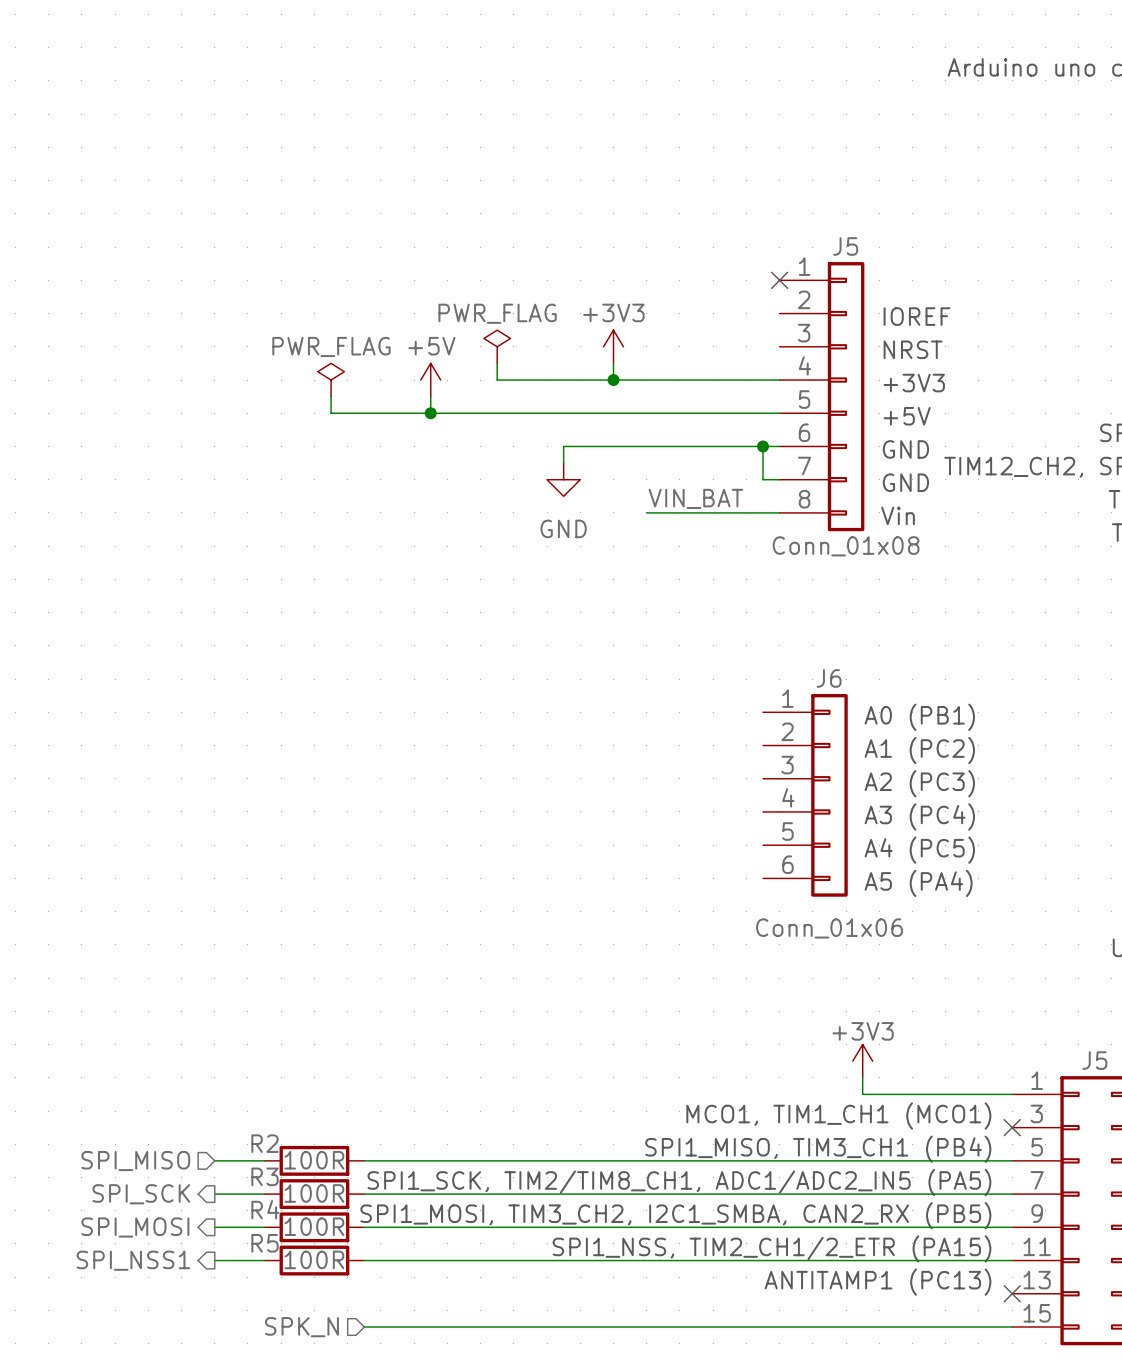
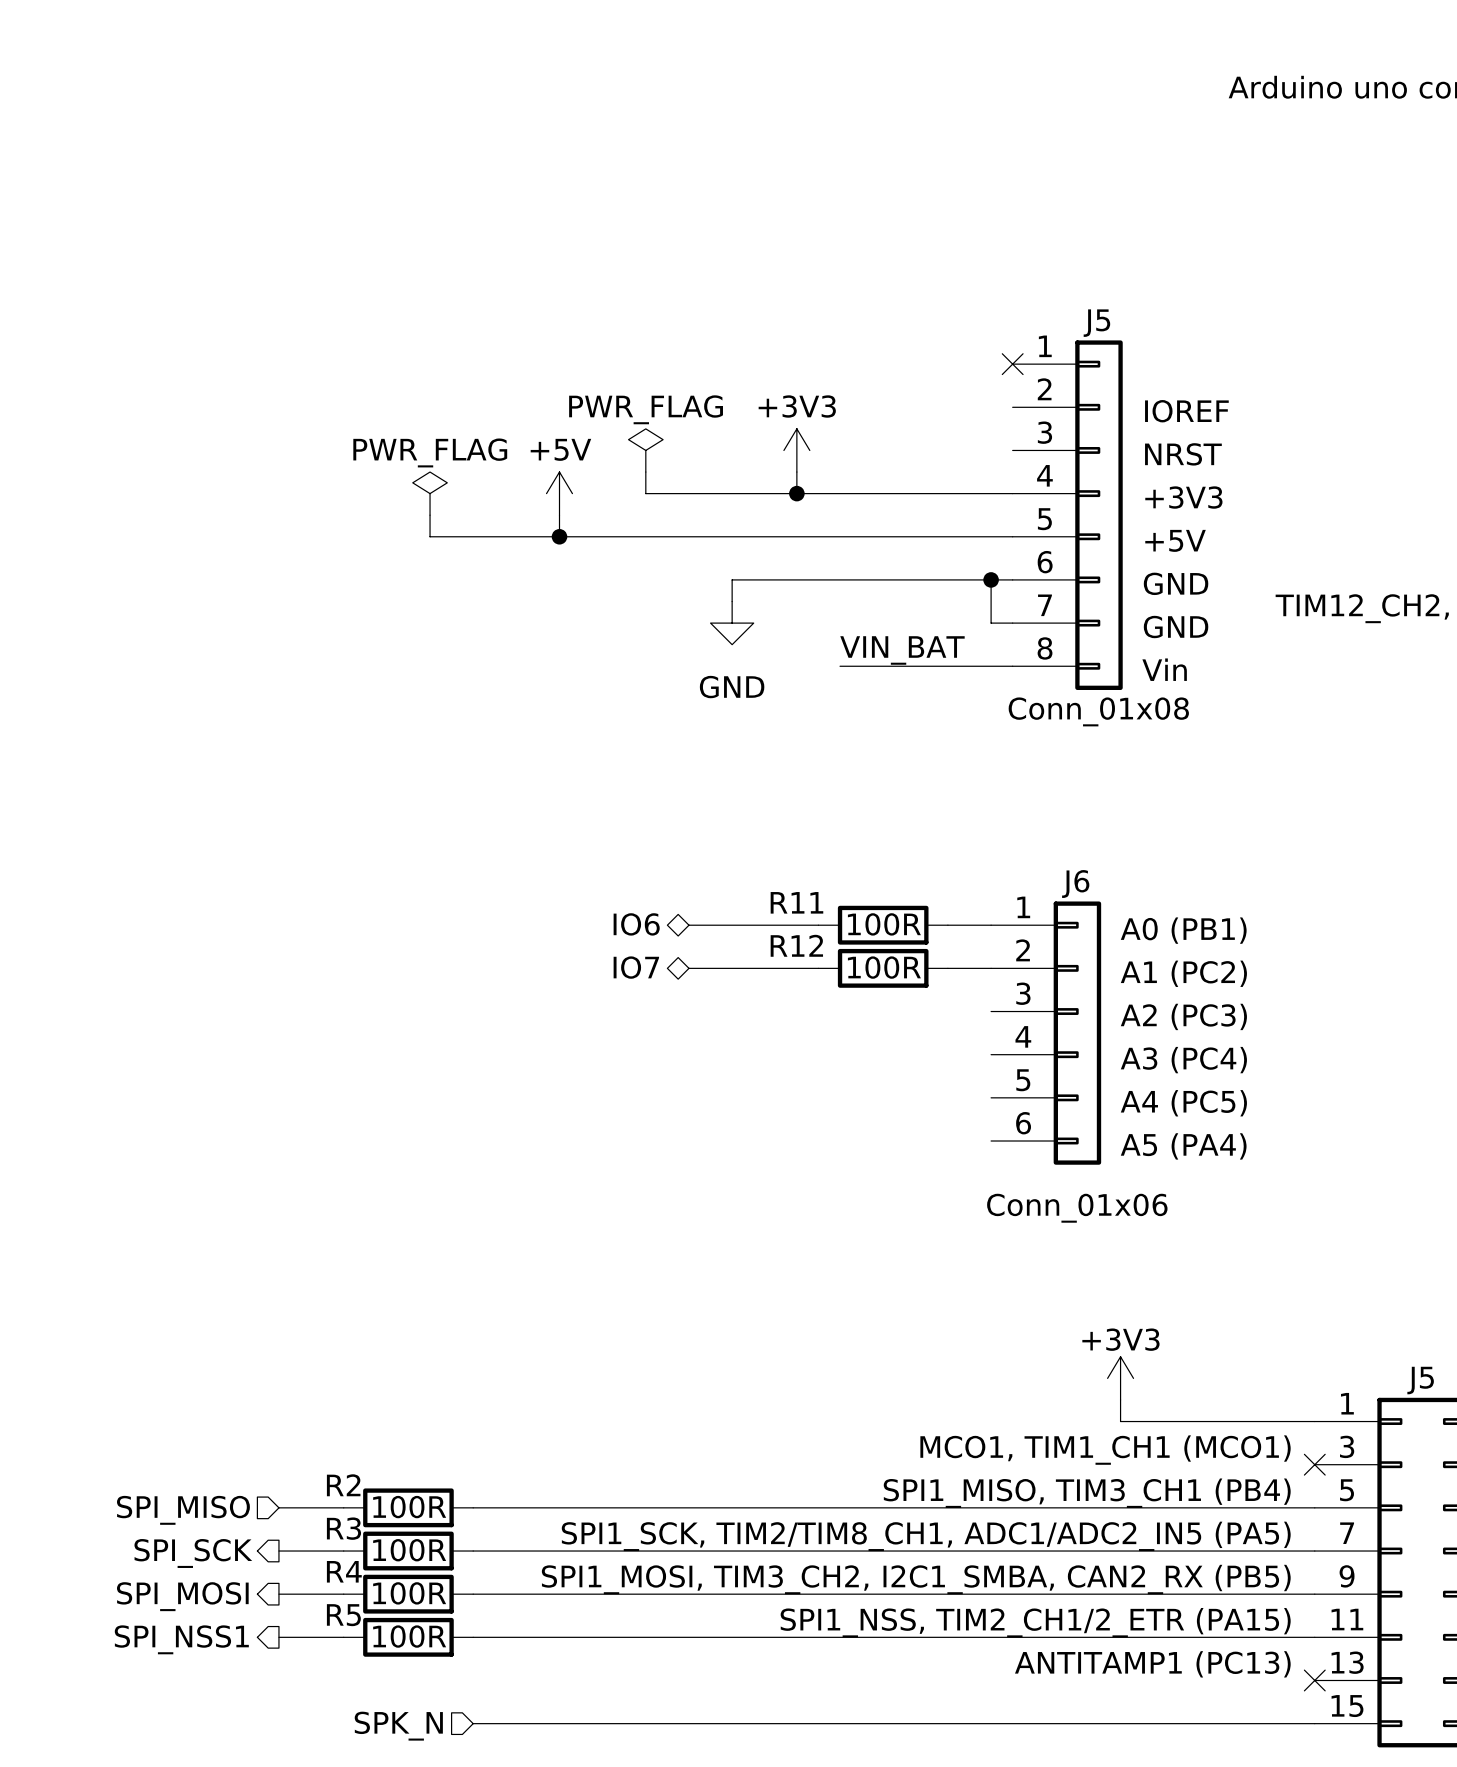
hierarchical label: none -> IO6 (636, 924)
wire: none -> (688, 925) (818, 925)
R11: none -> 100R (883, 925)
wire: none -> (947, 925) (991, 925)
hierarchical label: none -> IO7 (636, 967)
wire: none -> (688, 968) (818, 968)
R12: none -> 100R (883, 968)
wire: none -> (947, 968) (991, 968)

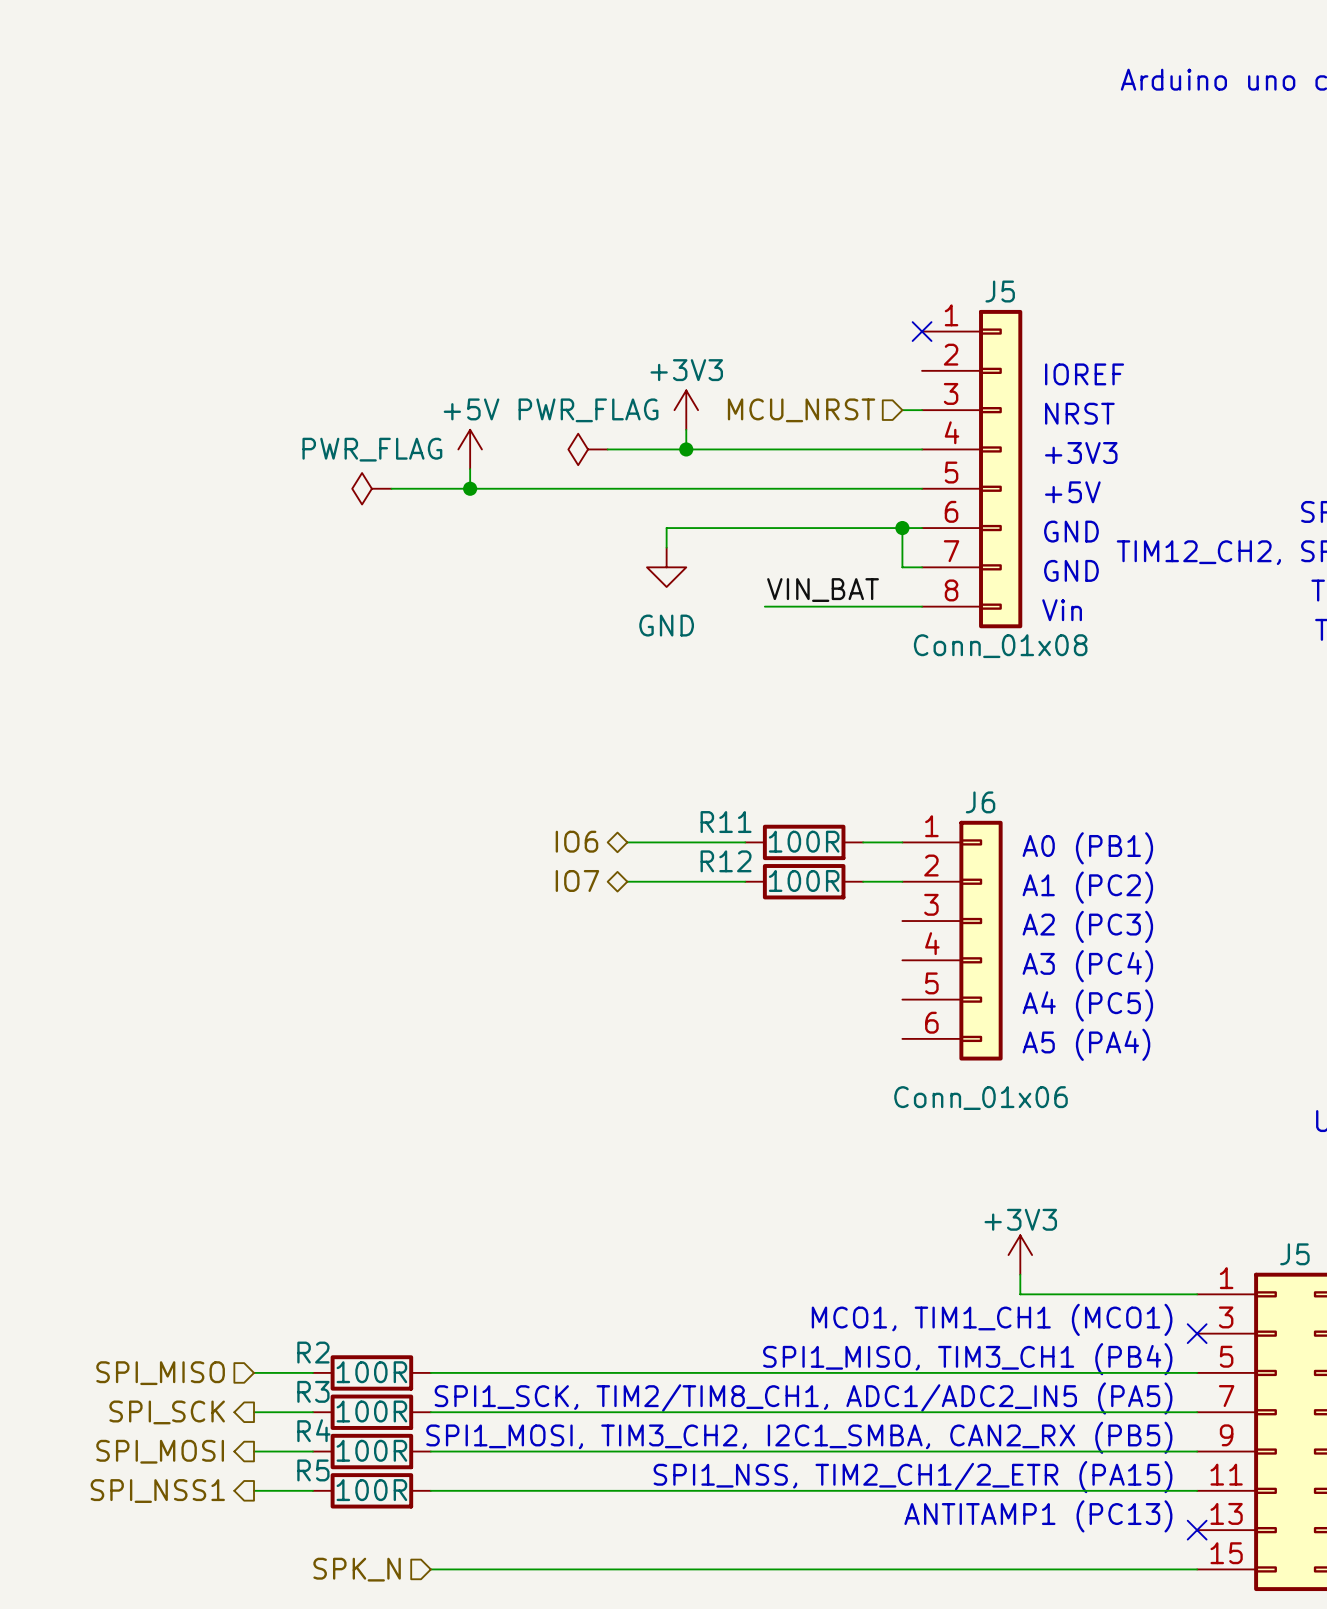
power symbol rotation: 0° (645, 450) -> 90° counterclockwise (588, 449)
power symbol position: PWR_FLAG (645, 450) -> PWR_FLAG (588, 449)
power symbol position: +3V3 (796, 450) -> +3V3 (686, 410)
wire: none -> (902, 410) (922, 410)
hierarchical label: none -> MCU_NRST (801, 410)
wire: (645, 472) (645, 493) (667, 493) -> none
wire: (796, 472) (796, 493) -> (686, 429) (686, 449)
power symbol rotation: 0° (430, 493) -> 90° counterclockwise (371, 488)
power symbol position: PWR_FLAG (430, 493) -> PWR_FLAG (371, 488)
power symbol position: +5V (559, 493) -> +5V (470, 449)
junction position: (796, 493) -> (686, 449)
wire: (430, 515) (430, 536) -> none
wire: (559, 515) (559, 536) -> (470, 469) (470, 488)
junction position: (559, 536) -> (470, 488)

